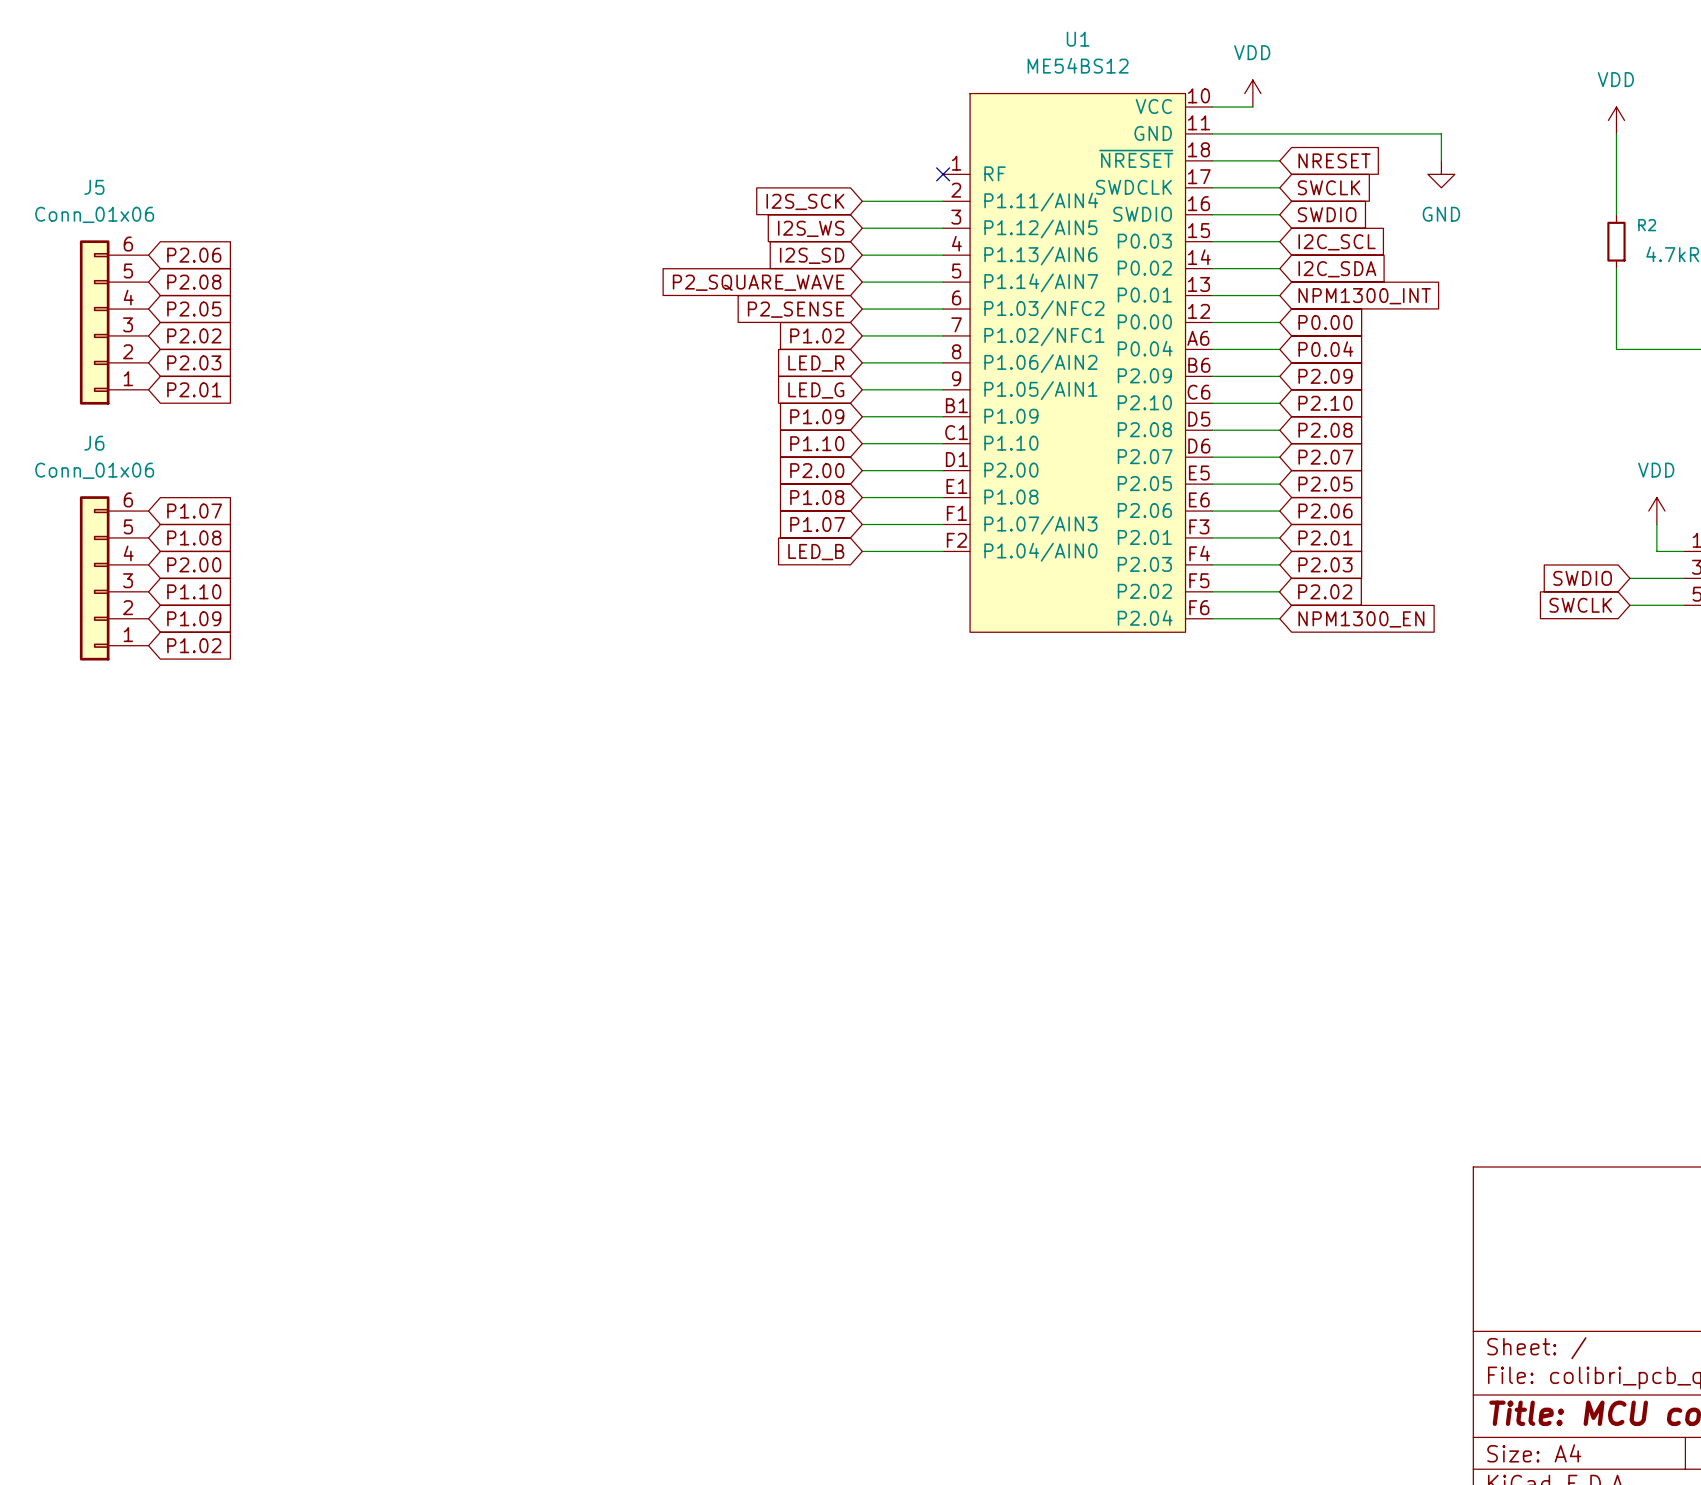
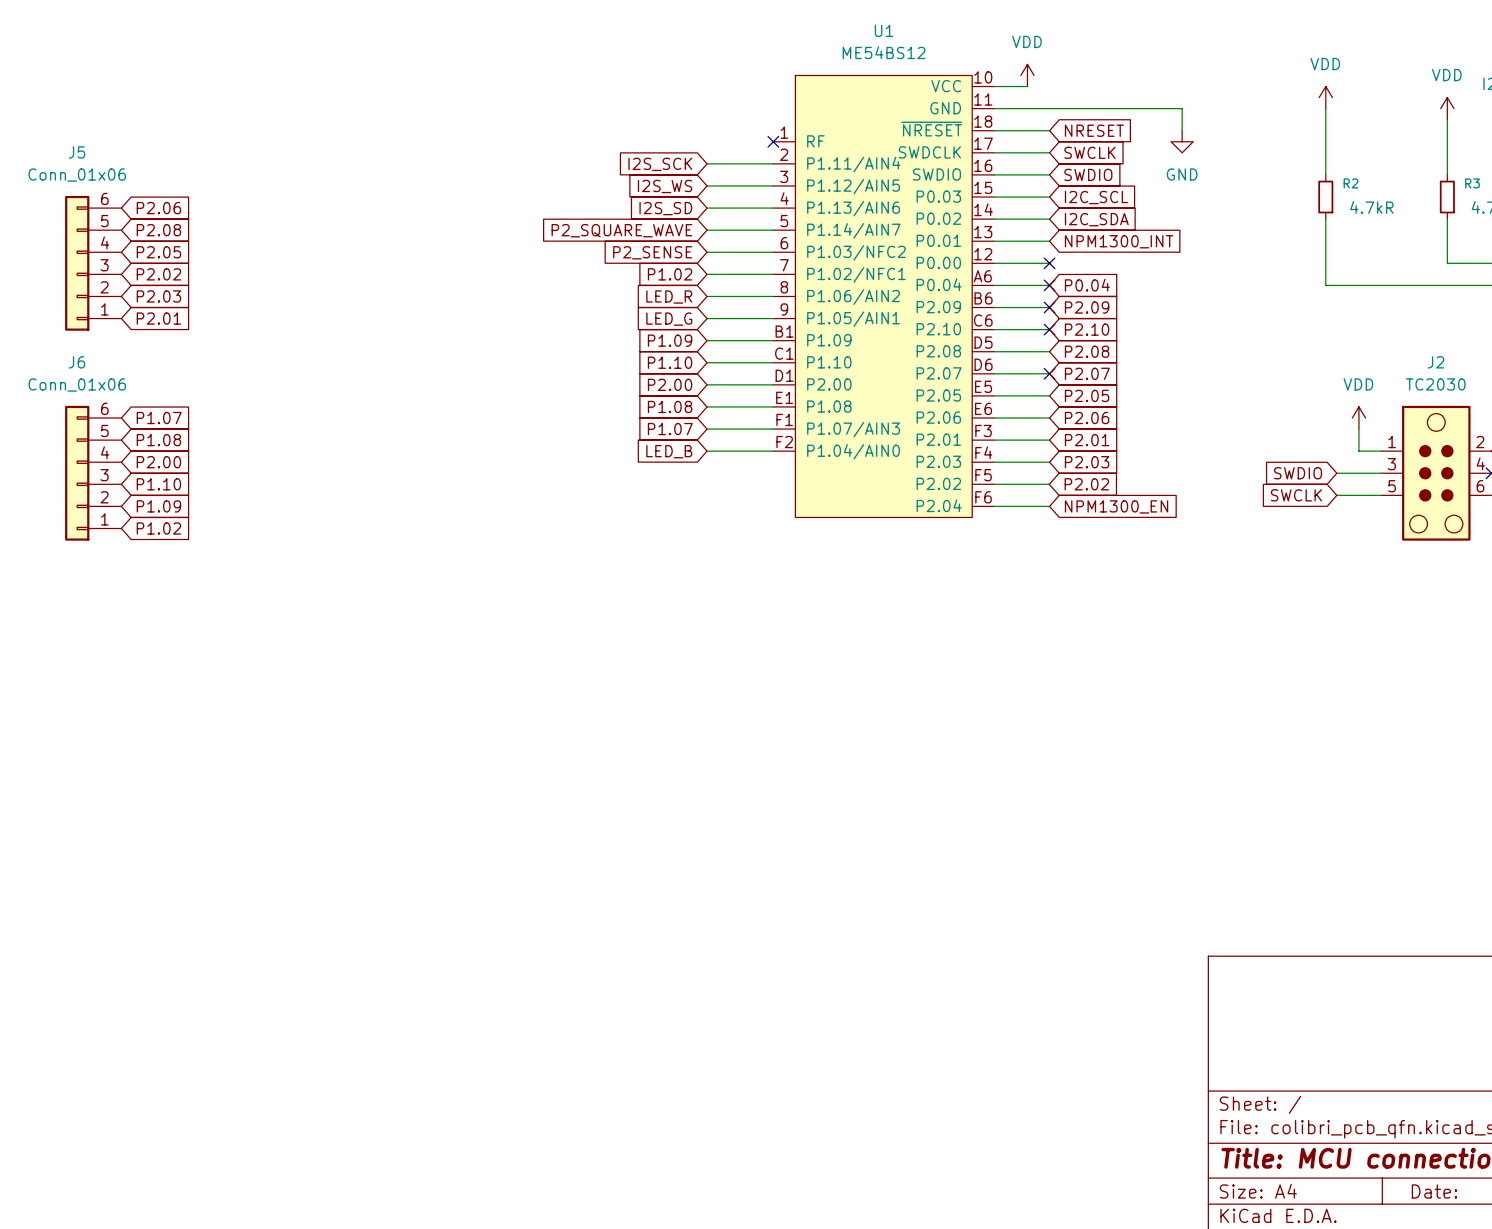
no-connect mark: none -> (1049, 263)
global label: P0.00 (1325, 322) -> none
no-connect mark: none -> (1049, 285)
no-connect mark: none -> (1049, 307)
no-connect mark: none -> (1049, 329)
no-connect mark: none -> (1049, 373)

